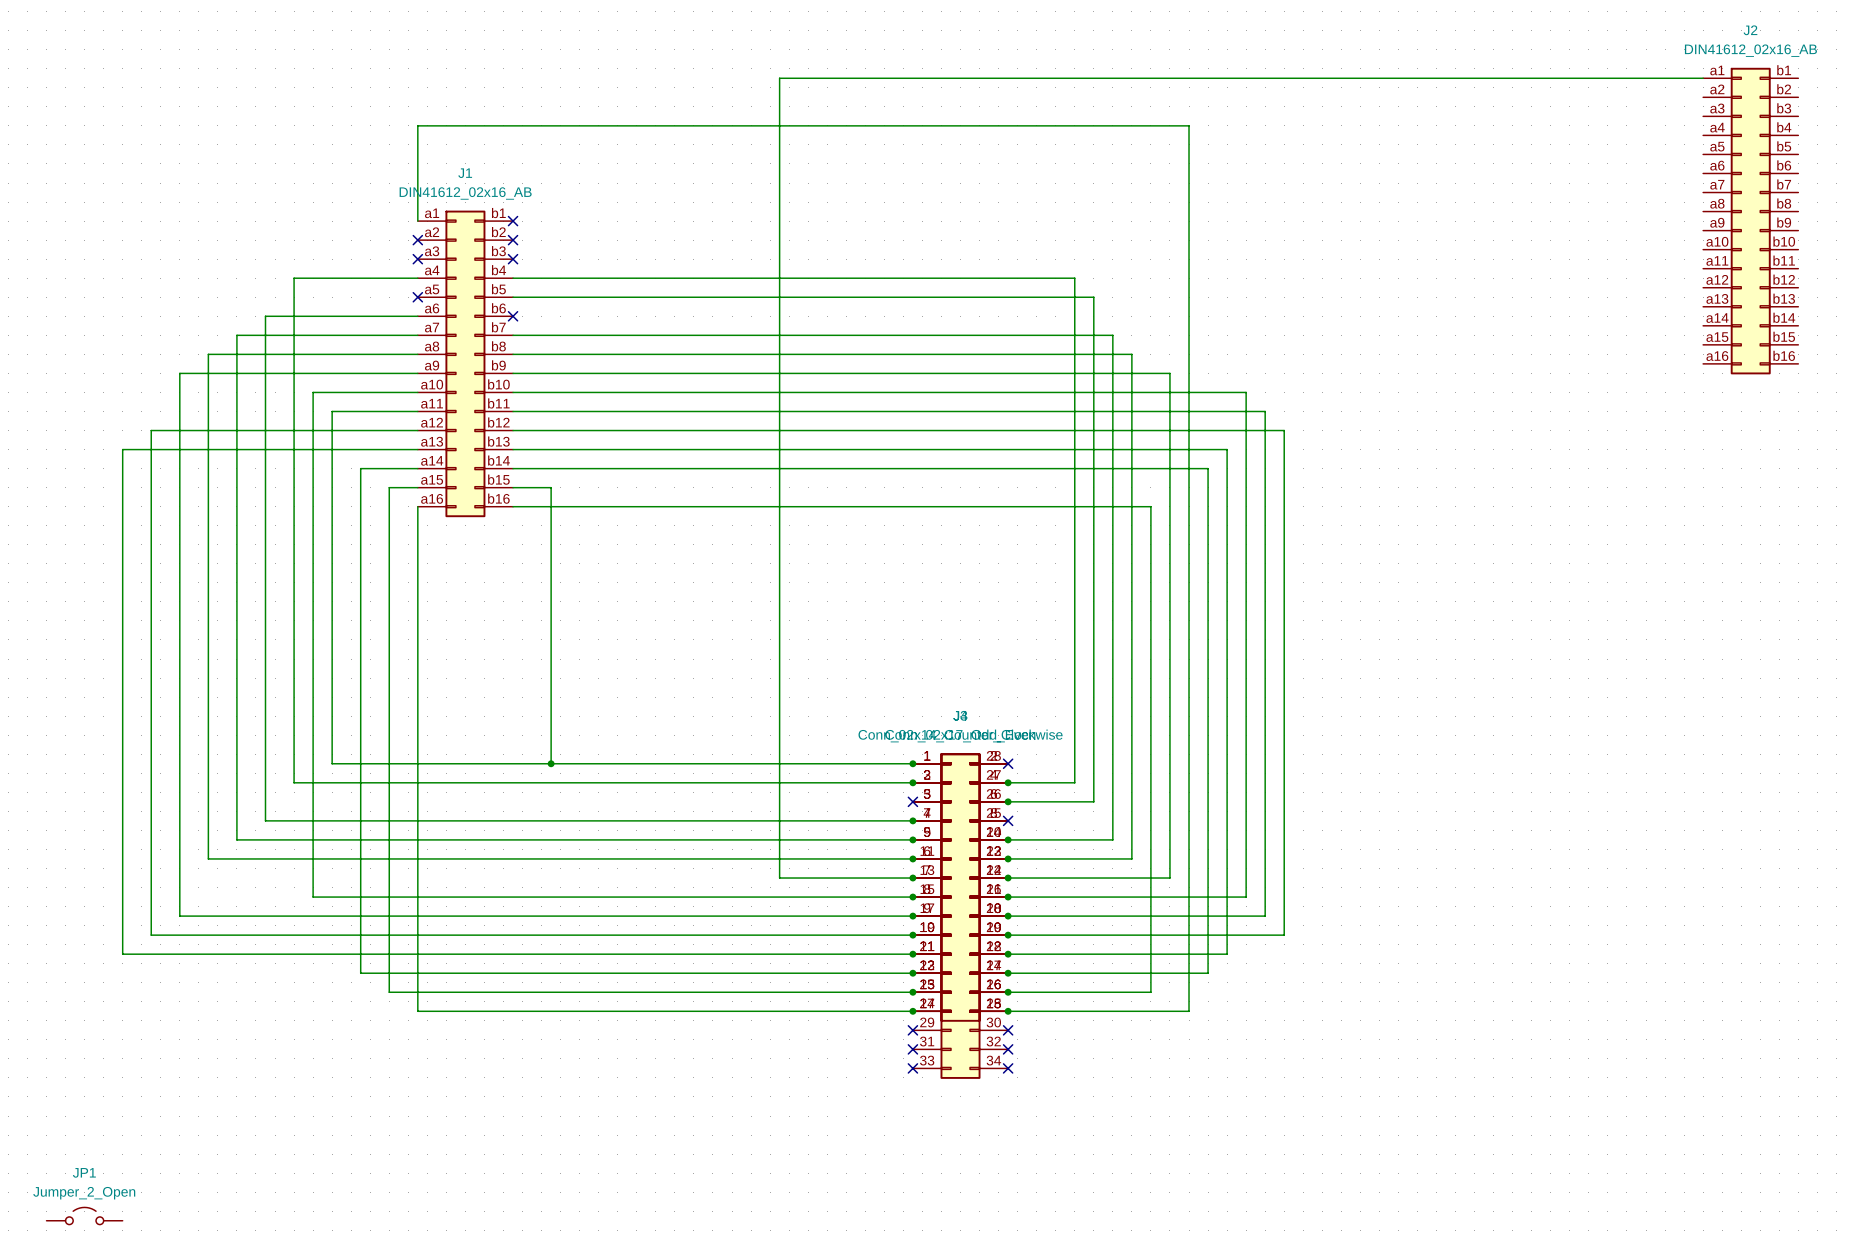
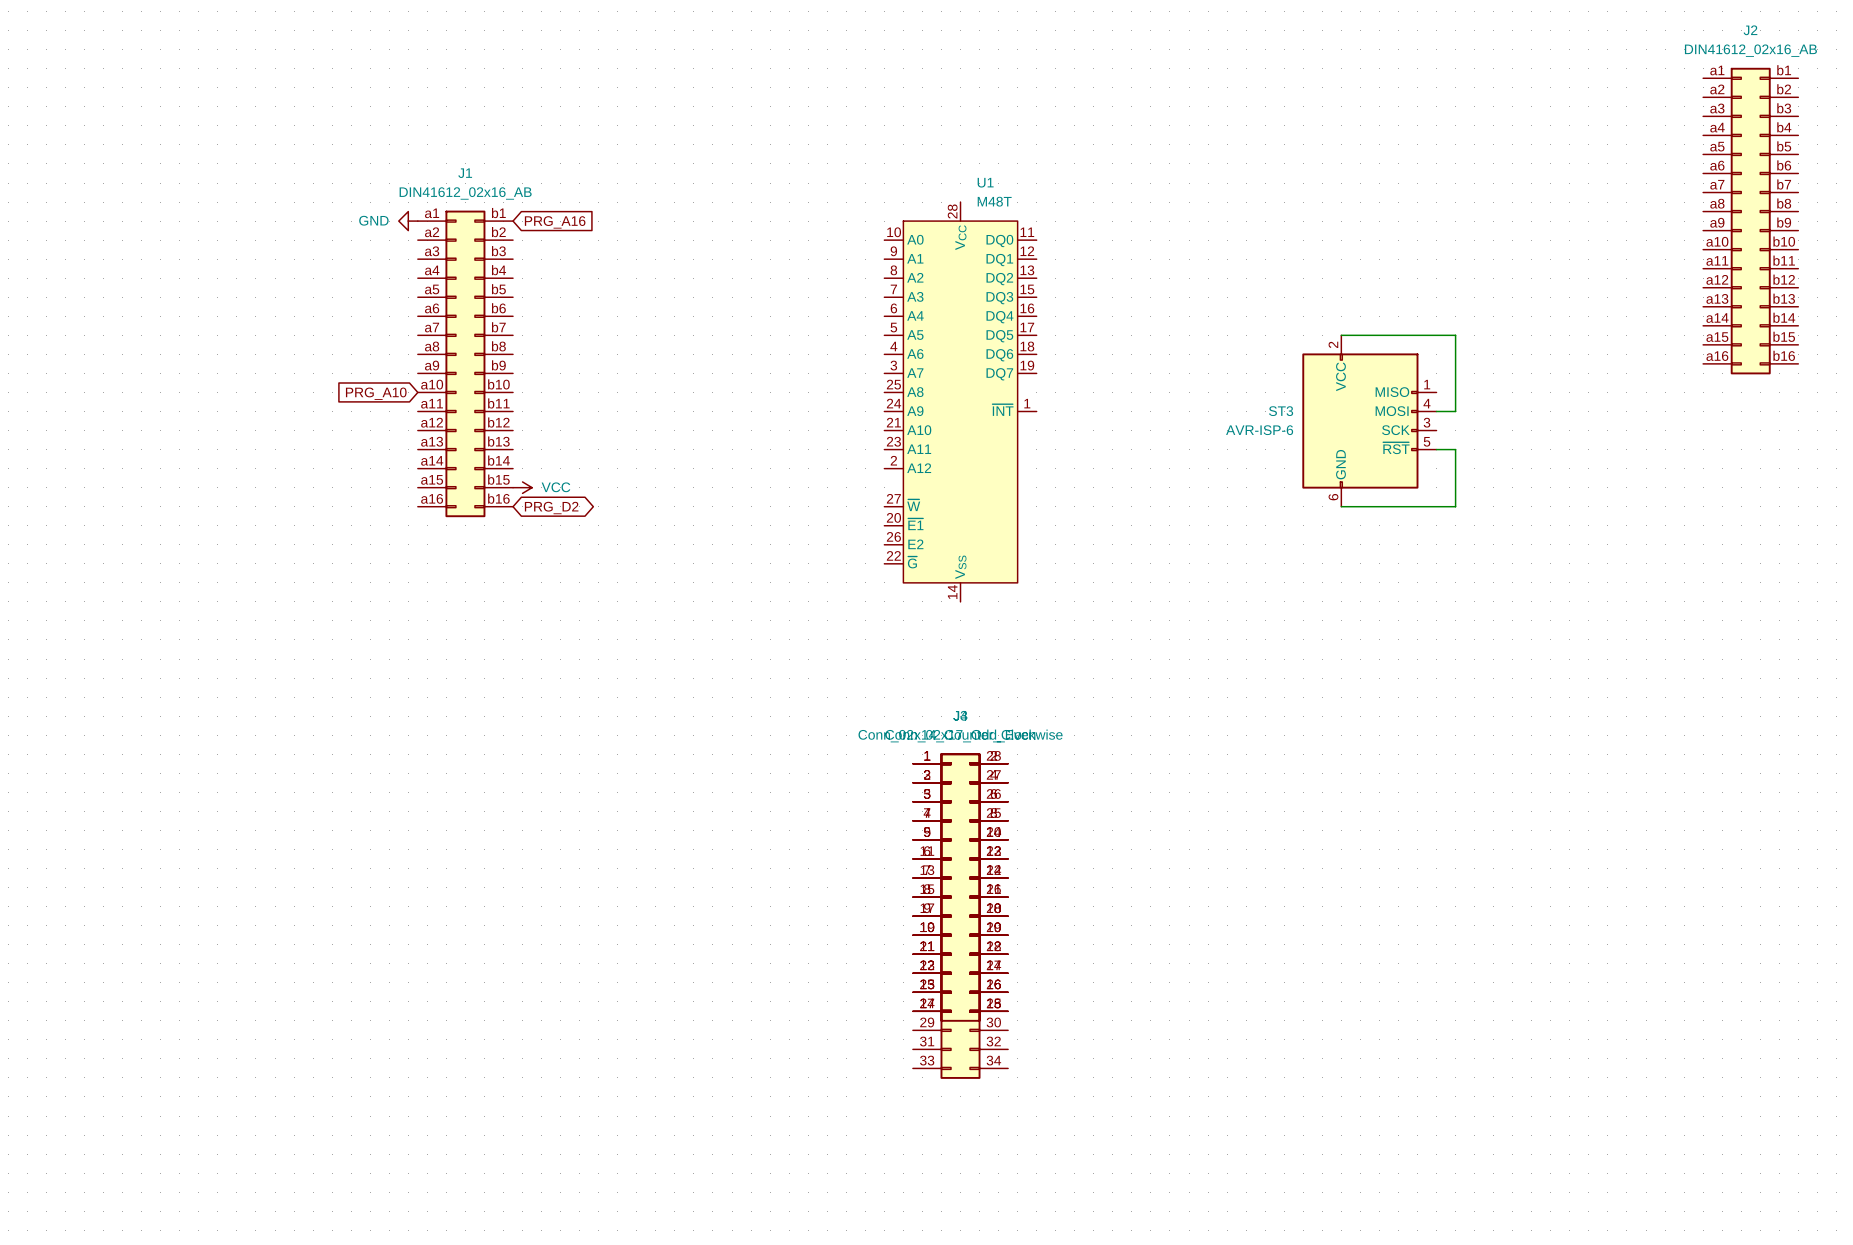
wire: (1703, 78) (779, 78) (779, 878) (912, 878) -> none
power symbol: none -> GND (408, 221)
wire: (417, 221) (417, 125) (1189, 125) (1189, 1011) (1008, 1011) -> none
no-connect mark: (513, 221) -> none
global label: none -> PRG_A16 (555, 222)
no-connect mark: (417, 240) -> none
no-connect mark: (513, 240) -> none
no-connect mark: (417, 259) -> none
no-connect mark: (513, 259) -> none
wire: (417, 278) (294, 278) (294, 782) (912, 782) -> none
wire: (513, 278) (1074, 278) (1074, 782) (1008, 782) -> none
no-connect mark: (417, 297) -> none
wire: (513, 297) (1093, 297) (1093, 801) (1008, 801) -> none
wire: (417, 316) (265, 316) (265, 820) (912, 820) -> none
no-connect mark: (513, 316) -> none
wire: (417, 335) (236, 335) (236, 839) (912, 839) -> none
wire: (513, 335) (1112, 335) (1112, 839) (1008, 839) -> none
wire: none -> (1341, 335) (1455, 335) (1455, 411) (1436, 411)
wire: (417, 354) (208, 354) (208, 858) (912, 858) -> none
wire: (513, 354) (1131, 354) (1131, 858) (1008, 858) -> none
wire: (417, 373) (179, 373) (179, 916) (912, 916) -> none
wire: (513, 373) (1169, 373) (1169, 878) (1008, 878) -> none
wire: (417, 392) (313, 392) (313, 897) (912, 897) -> none
wire: (513, 392) (1246, 392) (1246, 897) (1008, 897) -> none
global label: none -> PRG_A10 (376, 393)
U1: none -> M48T (960, 401)
wire: (417, 411) (332, 411) (332, 763) (912, 763) -> none
wire: (513, 411) (1265, 411) (1265, 916) (1008, 916) -> none
ST3: none -> AVR-ISP-6 (1369, 421)
wire: (417, 430) (151, 430) (151, 935) (912, 935) -> none
wire: (513, 430) (1284, 430) (1284, 935) (1008, 935) -> none
wire: (417, 449) (122, 449) (122, 954) (912, 954) -> none
wire: (513, 449) (1227, 449) (1227, 954) (1008, 954) -> none
wire: none -> (1436, 449) (1455, 449) (1455, 506) (1341, 506)
wire: (417, 468) (360, 468) (360, 973) (912, 973) -> none
wire: (513, 468) (1208, 468) (1208, 973) (1008, 973) -> none
wire: (417, 487) (389, 487) (389, 992) (912, 992) -> none
wire: (513, 487) (551, 487) (551, 763) -> none
power symbol: none -> VCC (522, 487)
wire: (417, 506) (417, 1011) (912, 1011) -> none
wire: (513, 506) (1150, 506) (1150, 992) (1008, 992) -> none
global label: none -> PRG_D2 (551, 508)
junction: (551, 763) -> none
junction: (912, 763) -> none
no-connect mark: (1008, 763) -> none
junction: (912, 782) -> none
junction: (1008, 782) -> none
no-connect mark: (912, 801) -> none
junction: (1008, 801) -> none
junction: (912, 820) -> none
no-connect mark: (1008, 820) -> none
junction: (912, 839) -> none
junction: (1008, 839) -> none
junction: (912, 858) -> none
junction: (1008, 858) -> none
junction: (912, 878) -> none
junction: (1008, 878) -> none
junction: (912, 897) -> none
junction: (1008, 897) -> none
junction: (912, 916) -> none
junction: (1008, 916) -> none
junction: (912, 935) -> none
junction: (1008, 935) -> none
junction: (912, 954) -> none
junction: (1008, 954) -> none
junction: (912, 973) -> none
junction: (1008, 973) -> none
junction: (912, 992) -> none
junction: (1008, 992) -> none
junction: (912, 1011) -> none
junction: (1008, 1011) -> none
no-connect mark: (912, 1030) -> none
no-connect mark: (1008, 1030) -> none
no-connect mark: (912, 1049) -> none
no-connect mark: (1008, 1049) -> none
no-connect mark: (912, 1068) -> none
no-connect mark: (1008, 1068) -> none
JP1: Jumper_2_Open (84, 1216) -> none

